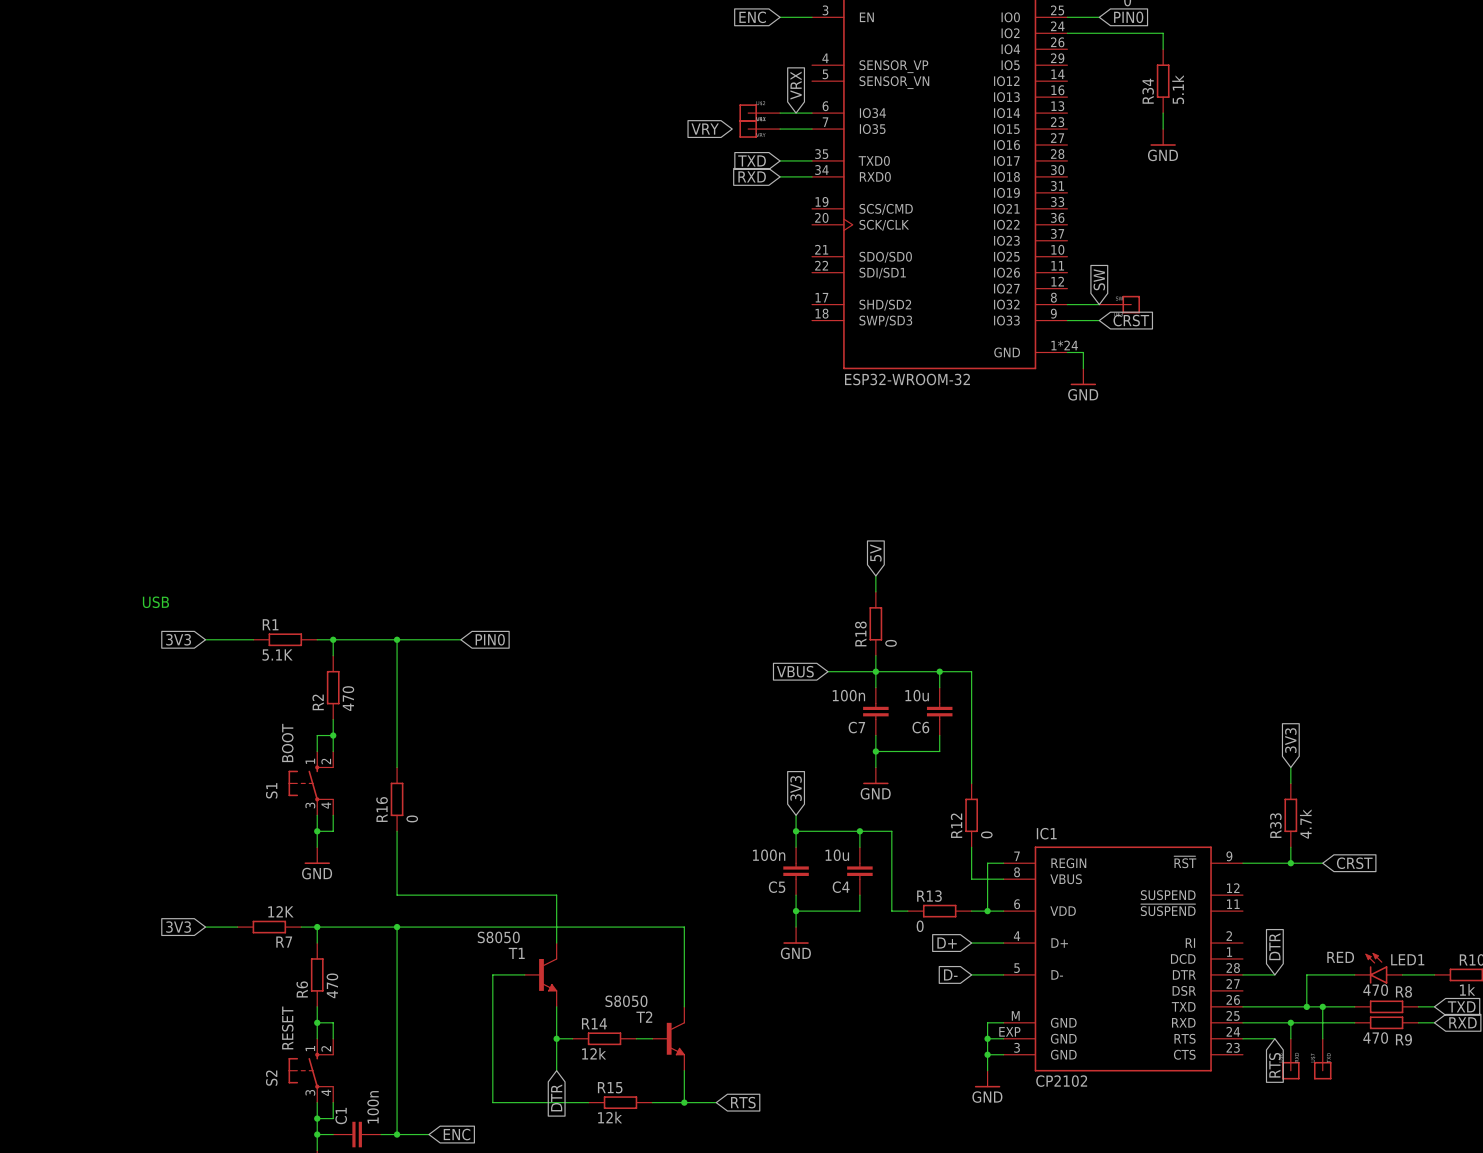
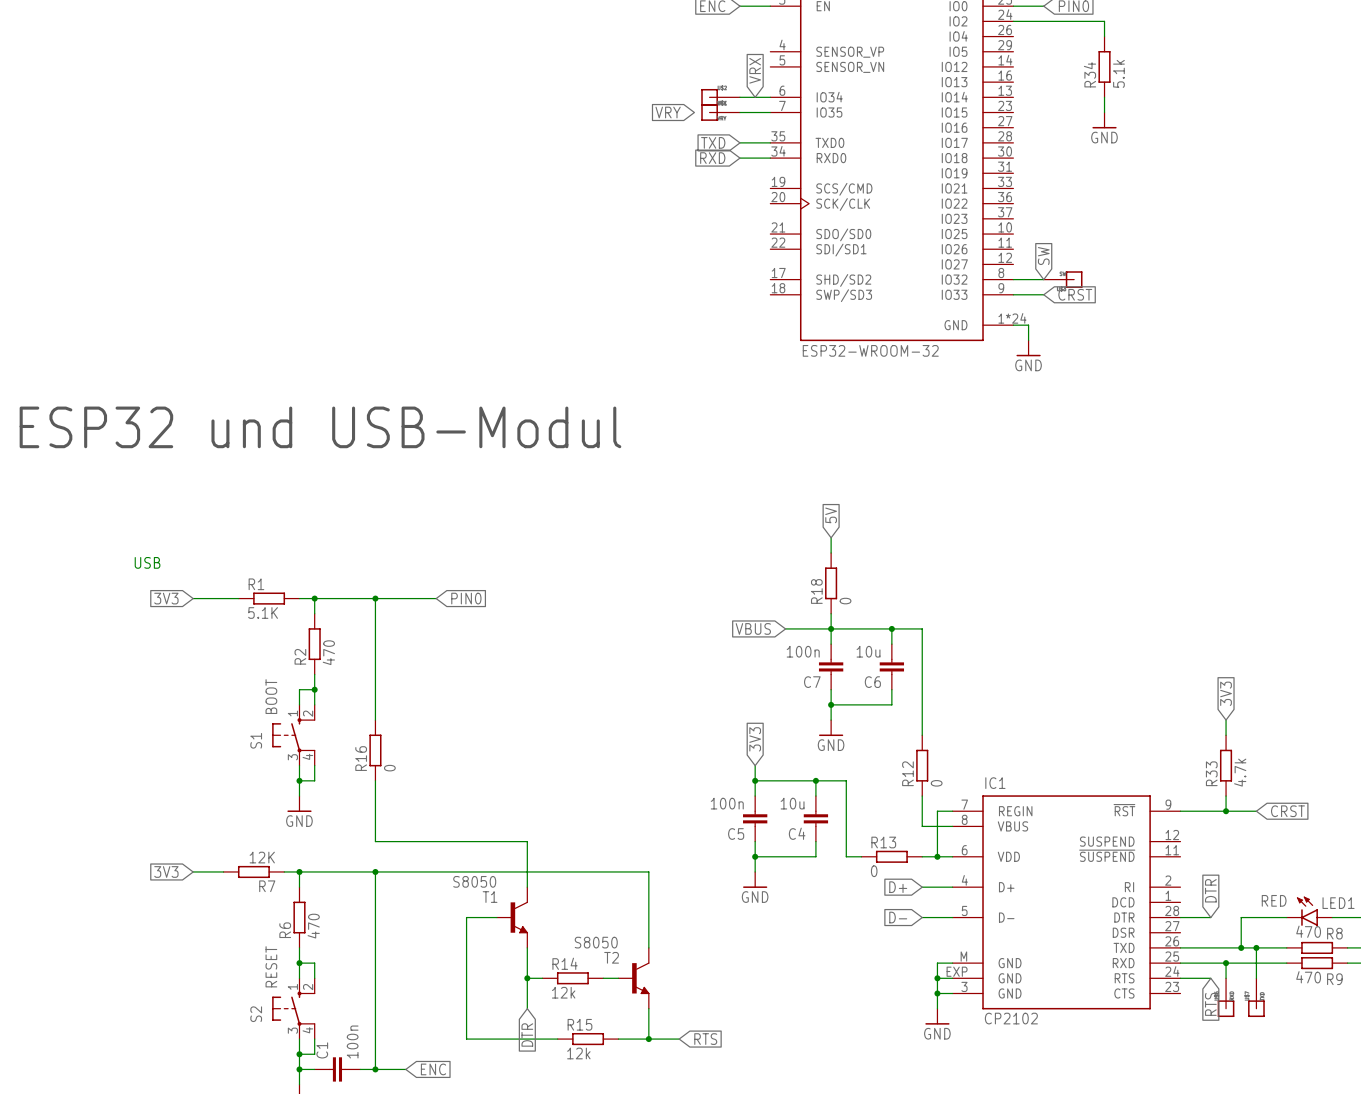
text: none -> ESP32 und USB-Modul (320, 427)

